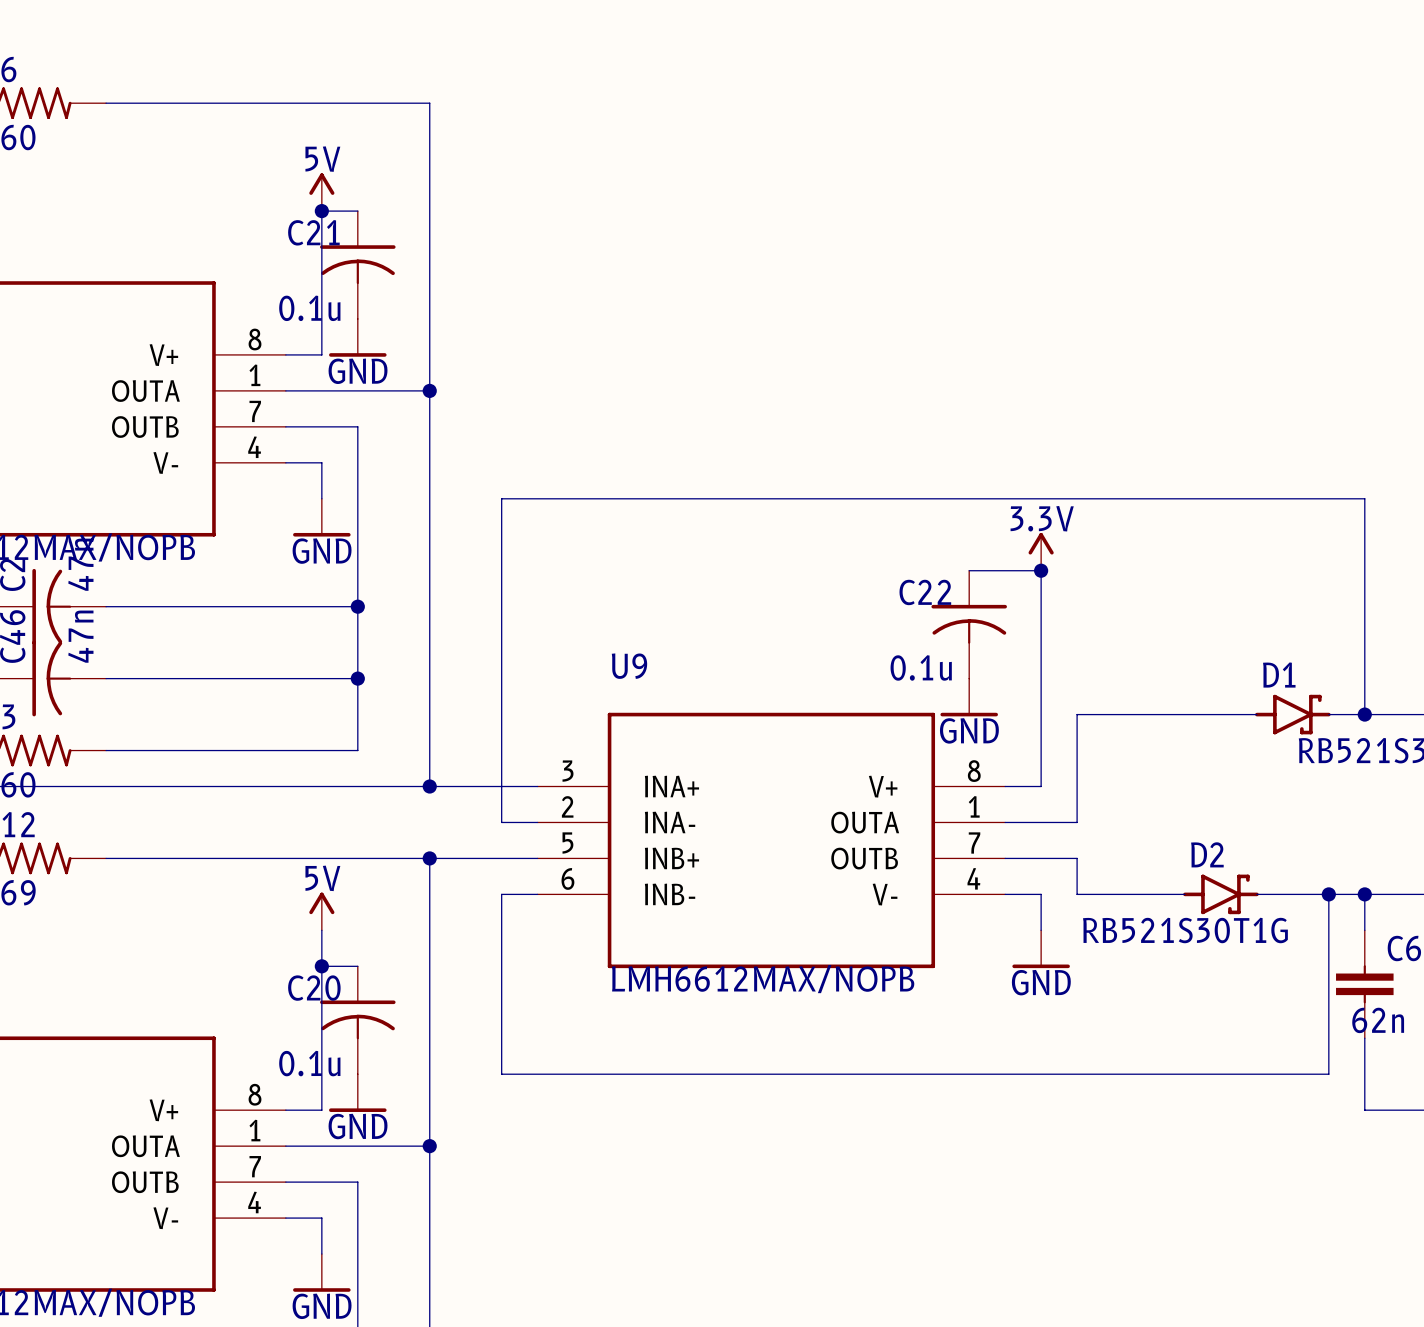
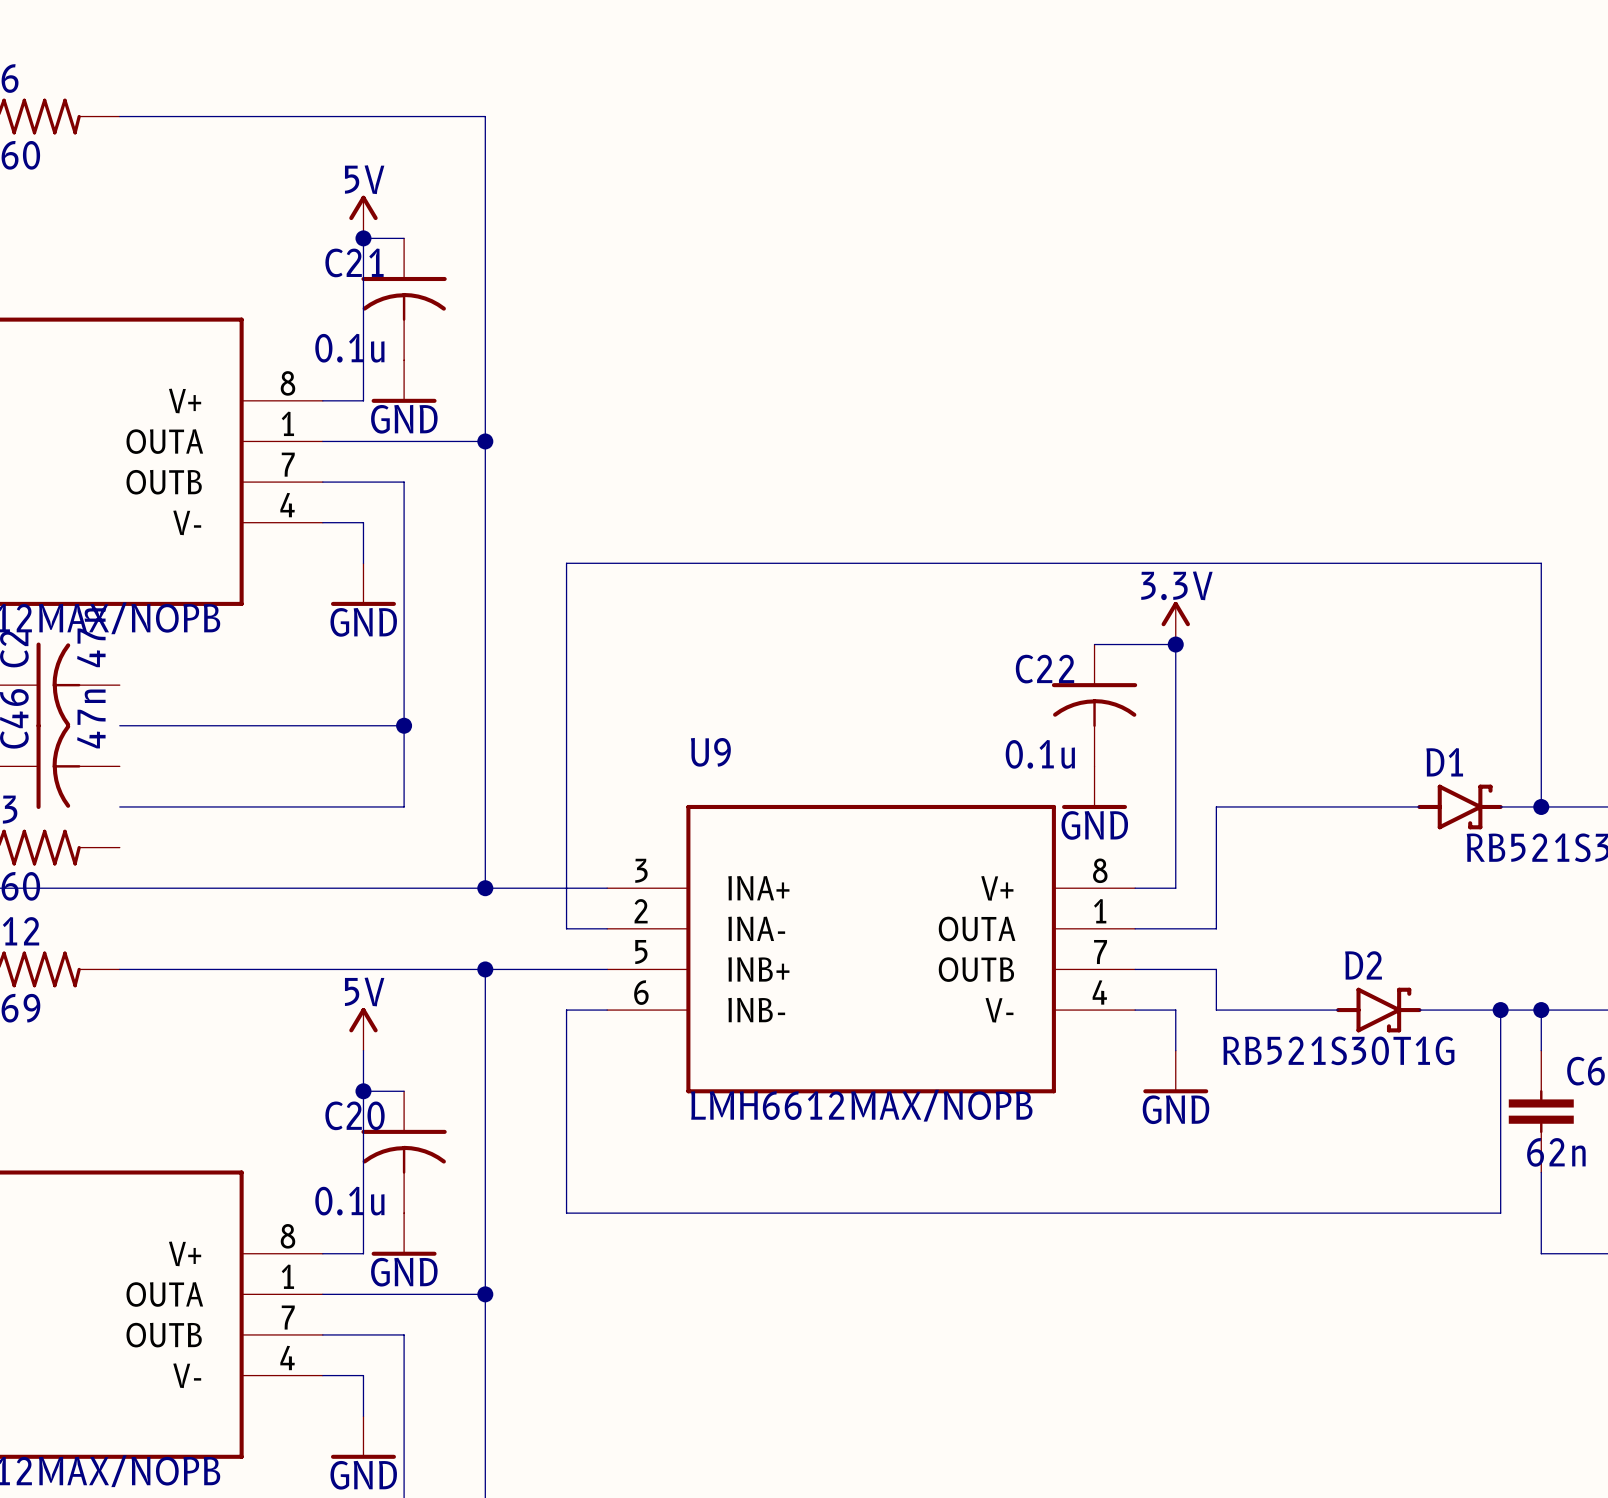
wire: (106, 606) (357, 606) -> (119, 725) (404, 725)
junction: (357, 606) -> none
junction: none -> (404, 725)
wire: (106, 678) (357, 678) -> none
junction: (357, 678) -> none
wire: (357, 714) (357, 750) (106, 750) -> (404, 806) (119, 806)

